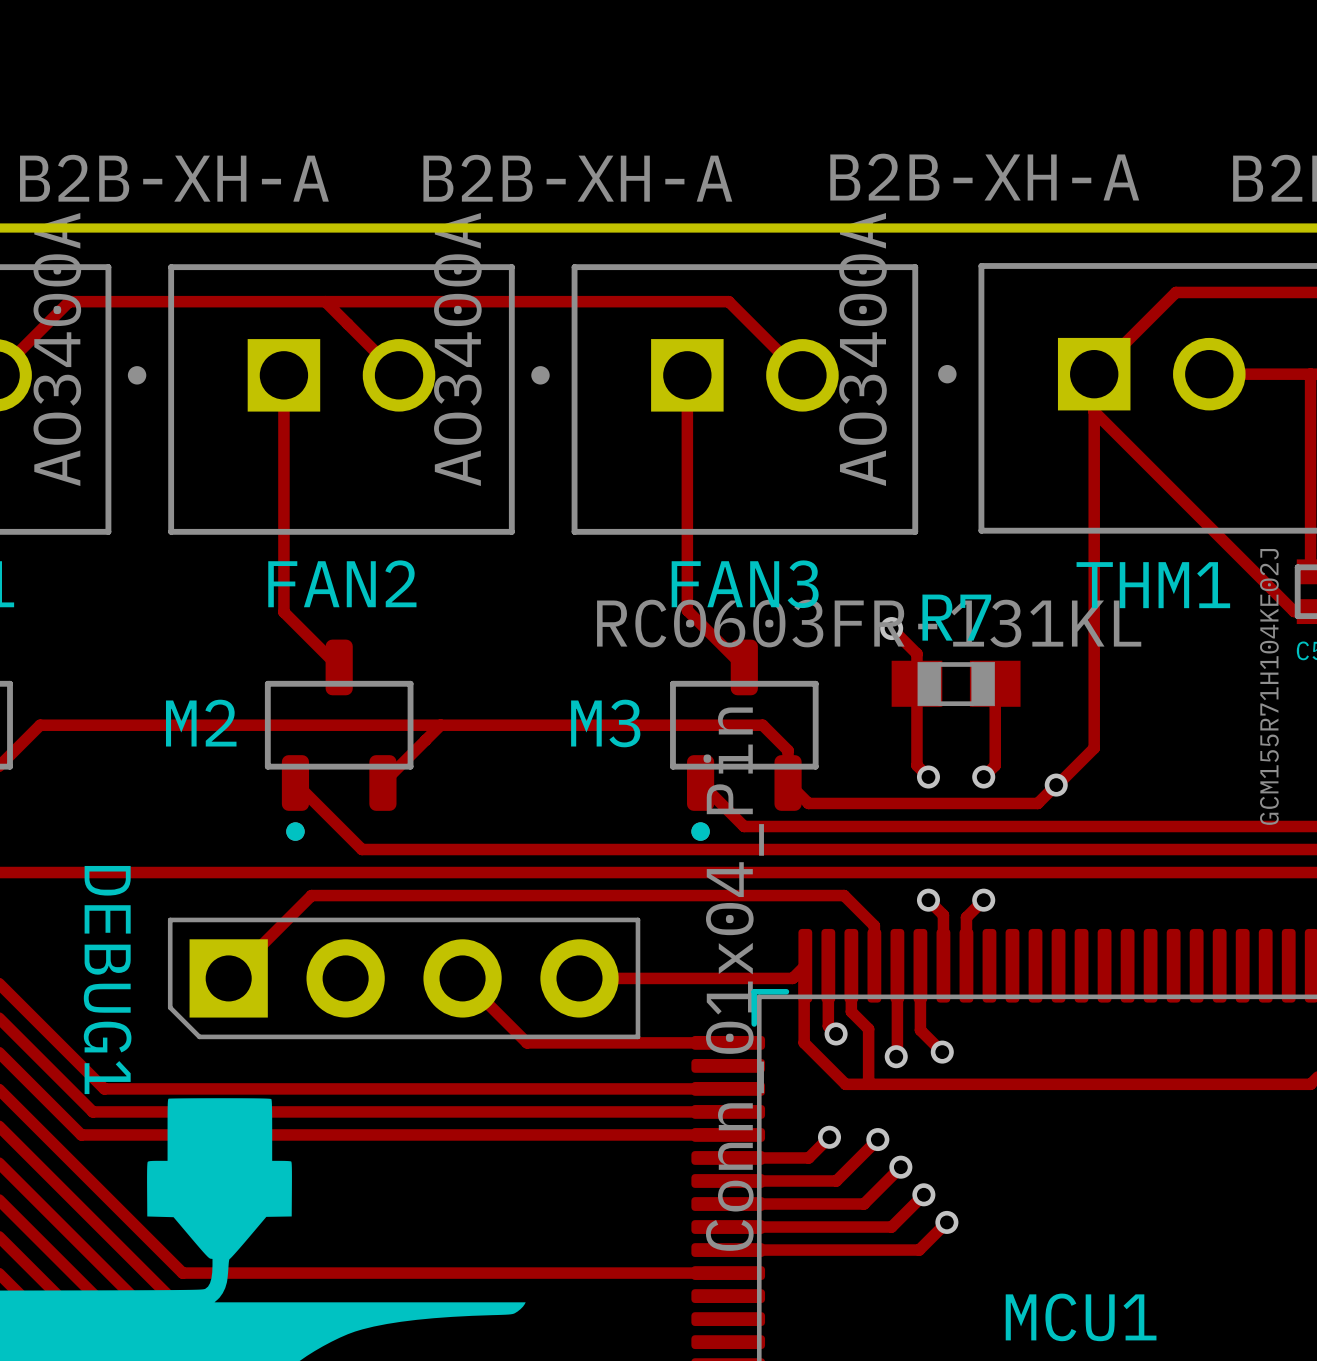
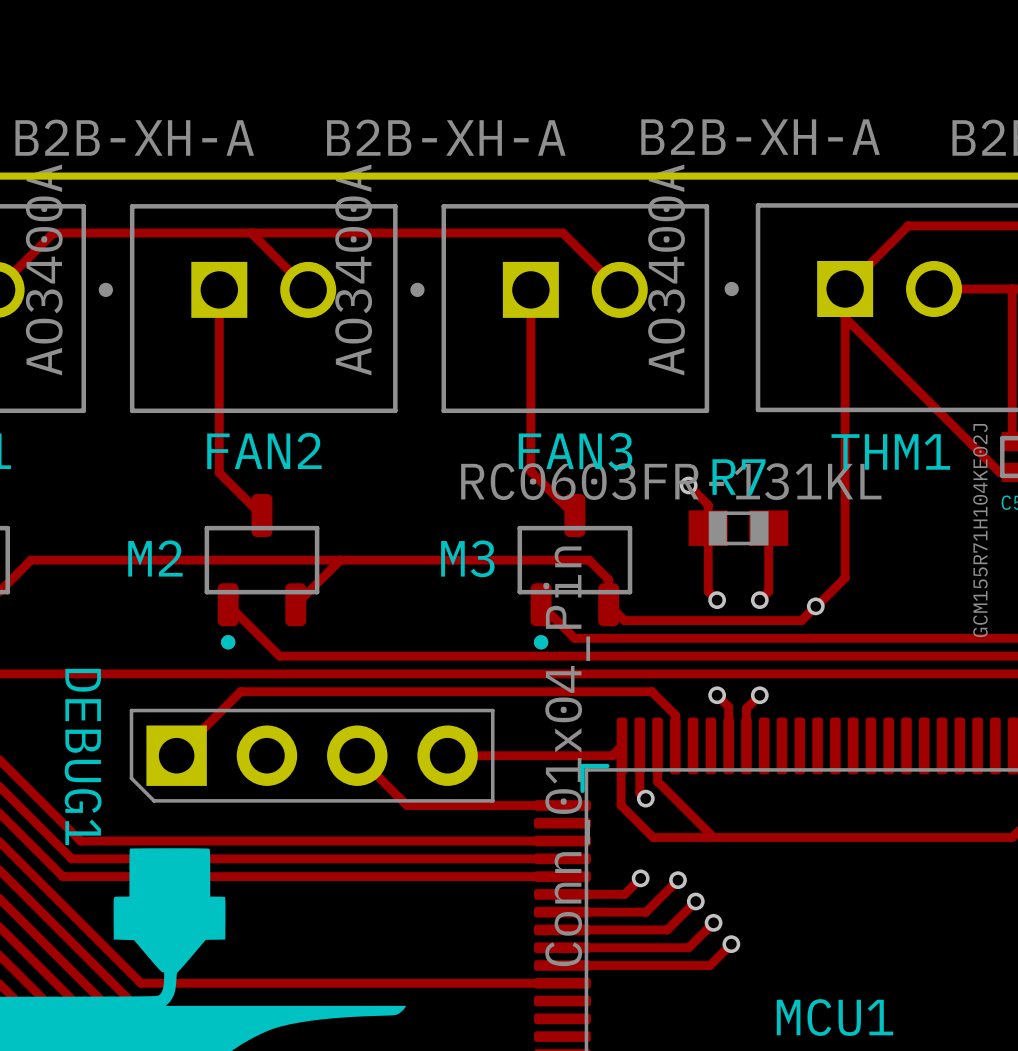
track: (897, 965) (896, 1056) -> none
track: (920, 965) (920, 1030) (942, 1052) -> none
track: (868, 1029) (868, 1084) -> (670, 794) (713, 837)
via: (942, 1052) -> none
via: (896, 1056) -> none

